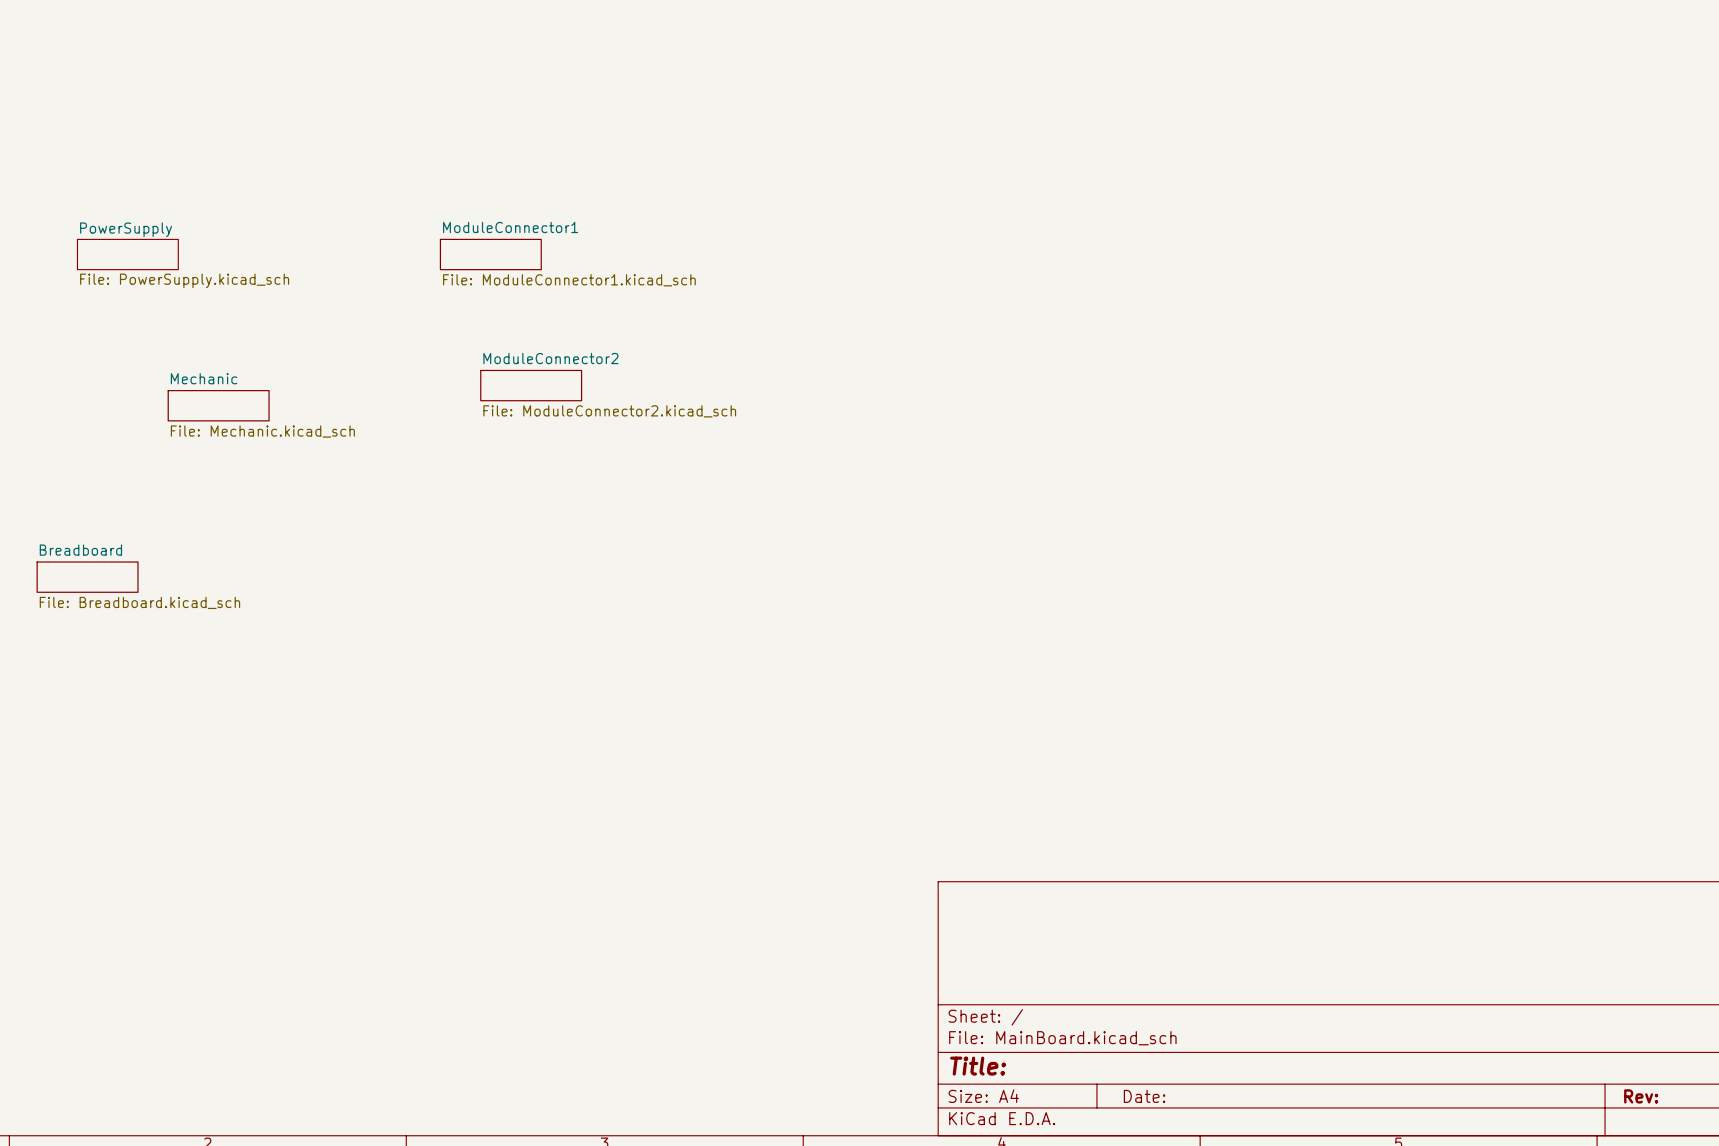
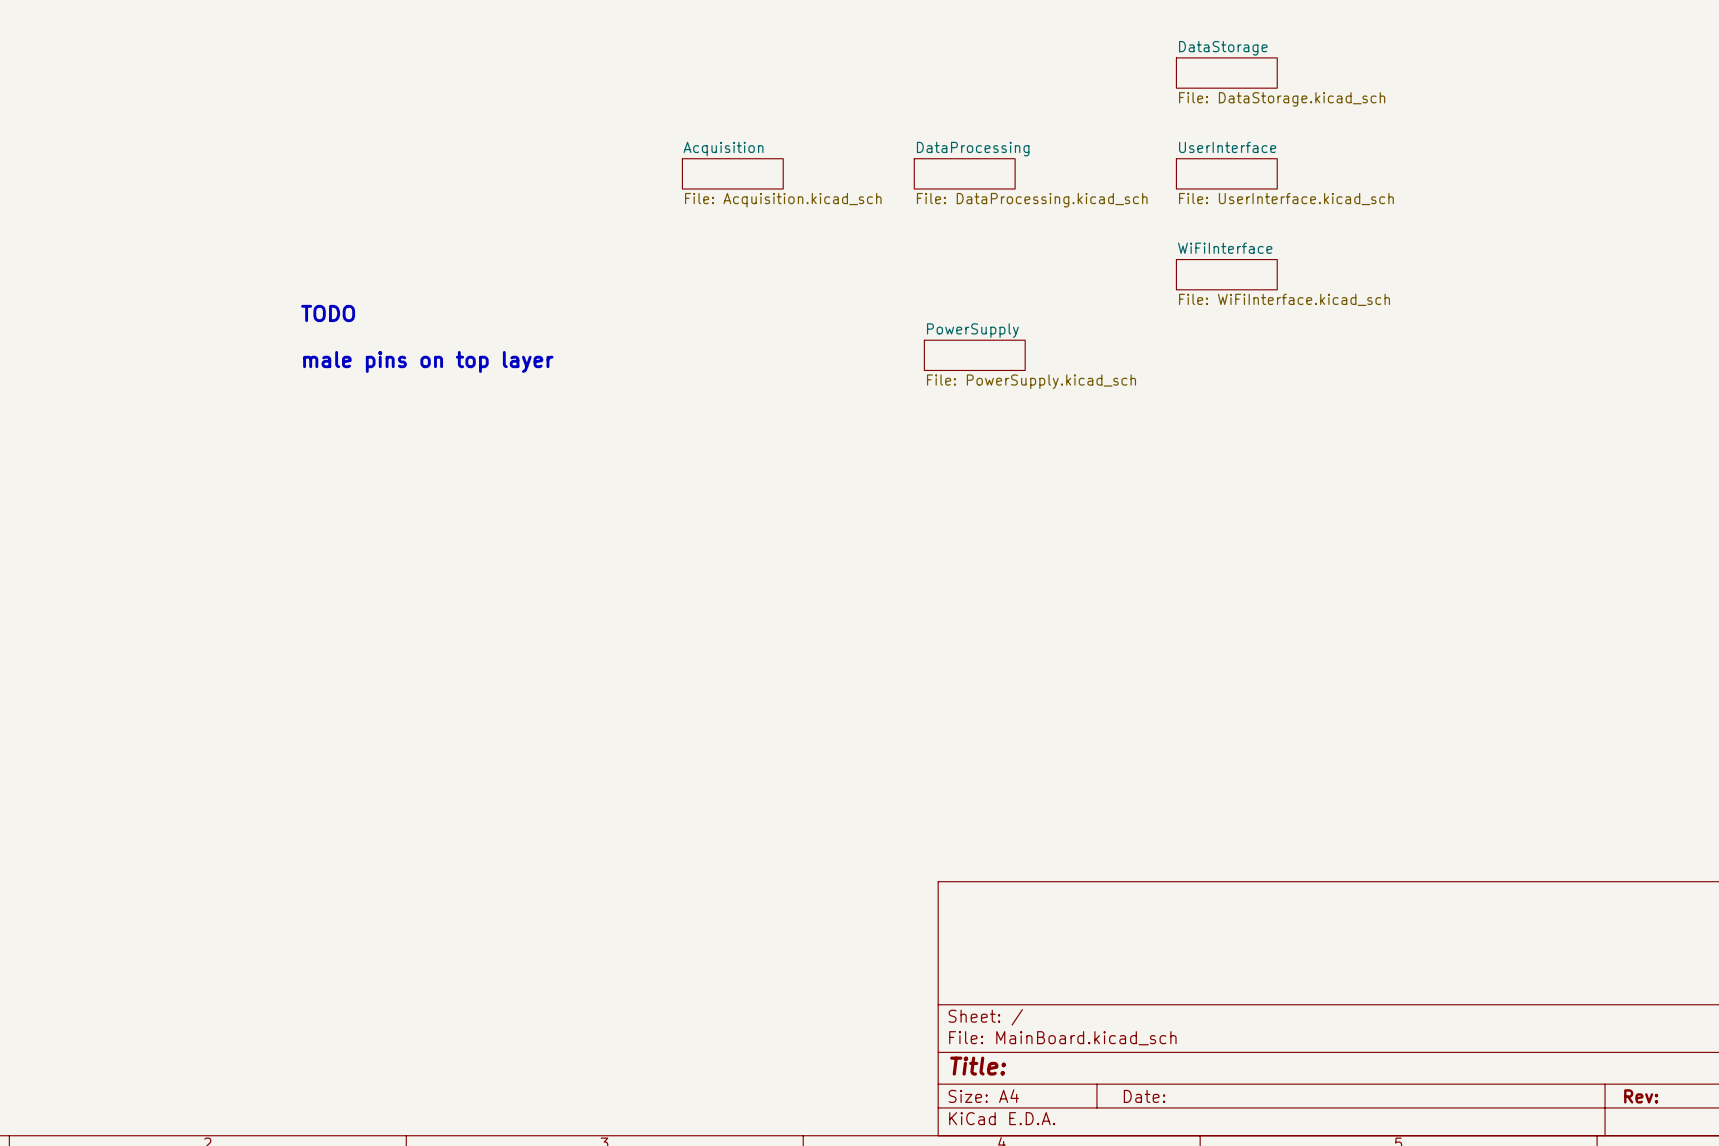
sheet DataStorage: none -> File: DataStorage.kicad_sch (1226, 73)
sheet Acquisition: none -> File: Acquisition.kicad_sch (732, 173)
sheet DataProcessing: none -> File: DataProcessing.kicad_sch (964, 173)
sheet UserInterface: none -> File: UserInterface.kicad_sch (1226, 173)
sheet PowerSupply: File: PowerSupply.kicad_sch (127, 254) -> none
sheet ModuleConnector1: File: ModuleConnector1.kicad_sch (490, 254) -> none
sheet WiFiInterface: none -> File: WiFiInterface.kicad_sch (1226, 274)
text: none -> TODO (328, 313)
sheet PowerSupply: none -> File: PowerSupply.kicad_sch (974, 355)
text: none -> male pins on top layer (428, 361)
sheet ModuleConnector2: File: ModuleConnector2.kicad_sch (531, 385) -> none
sheet Mechanic: File: Mechanic.kicad_sch (218, 405) -> none
sheet Breadboard: File: Breadboard.kicad_sch (87, 577) -> none

